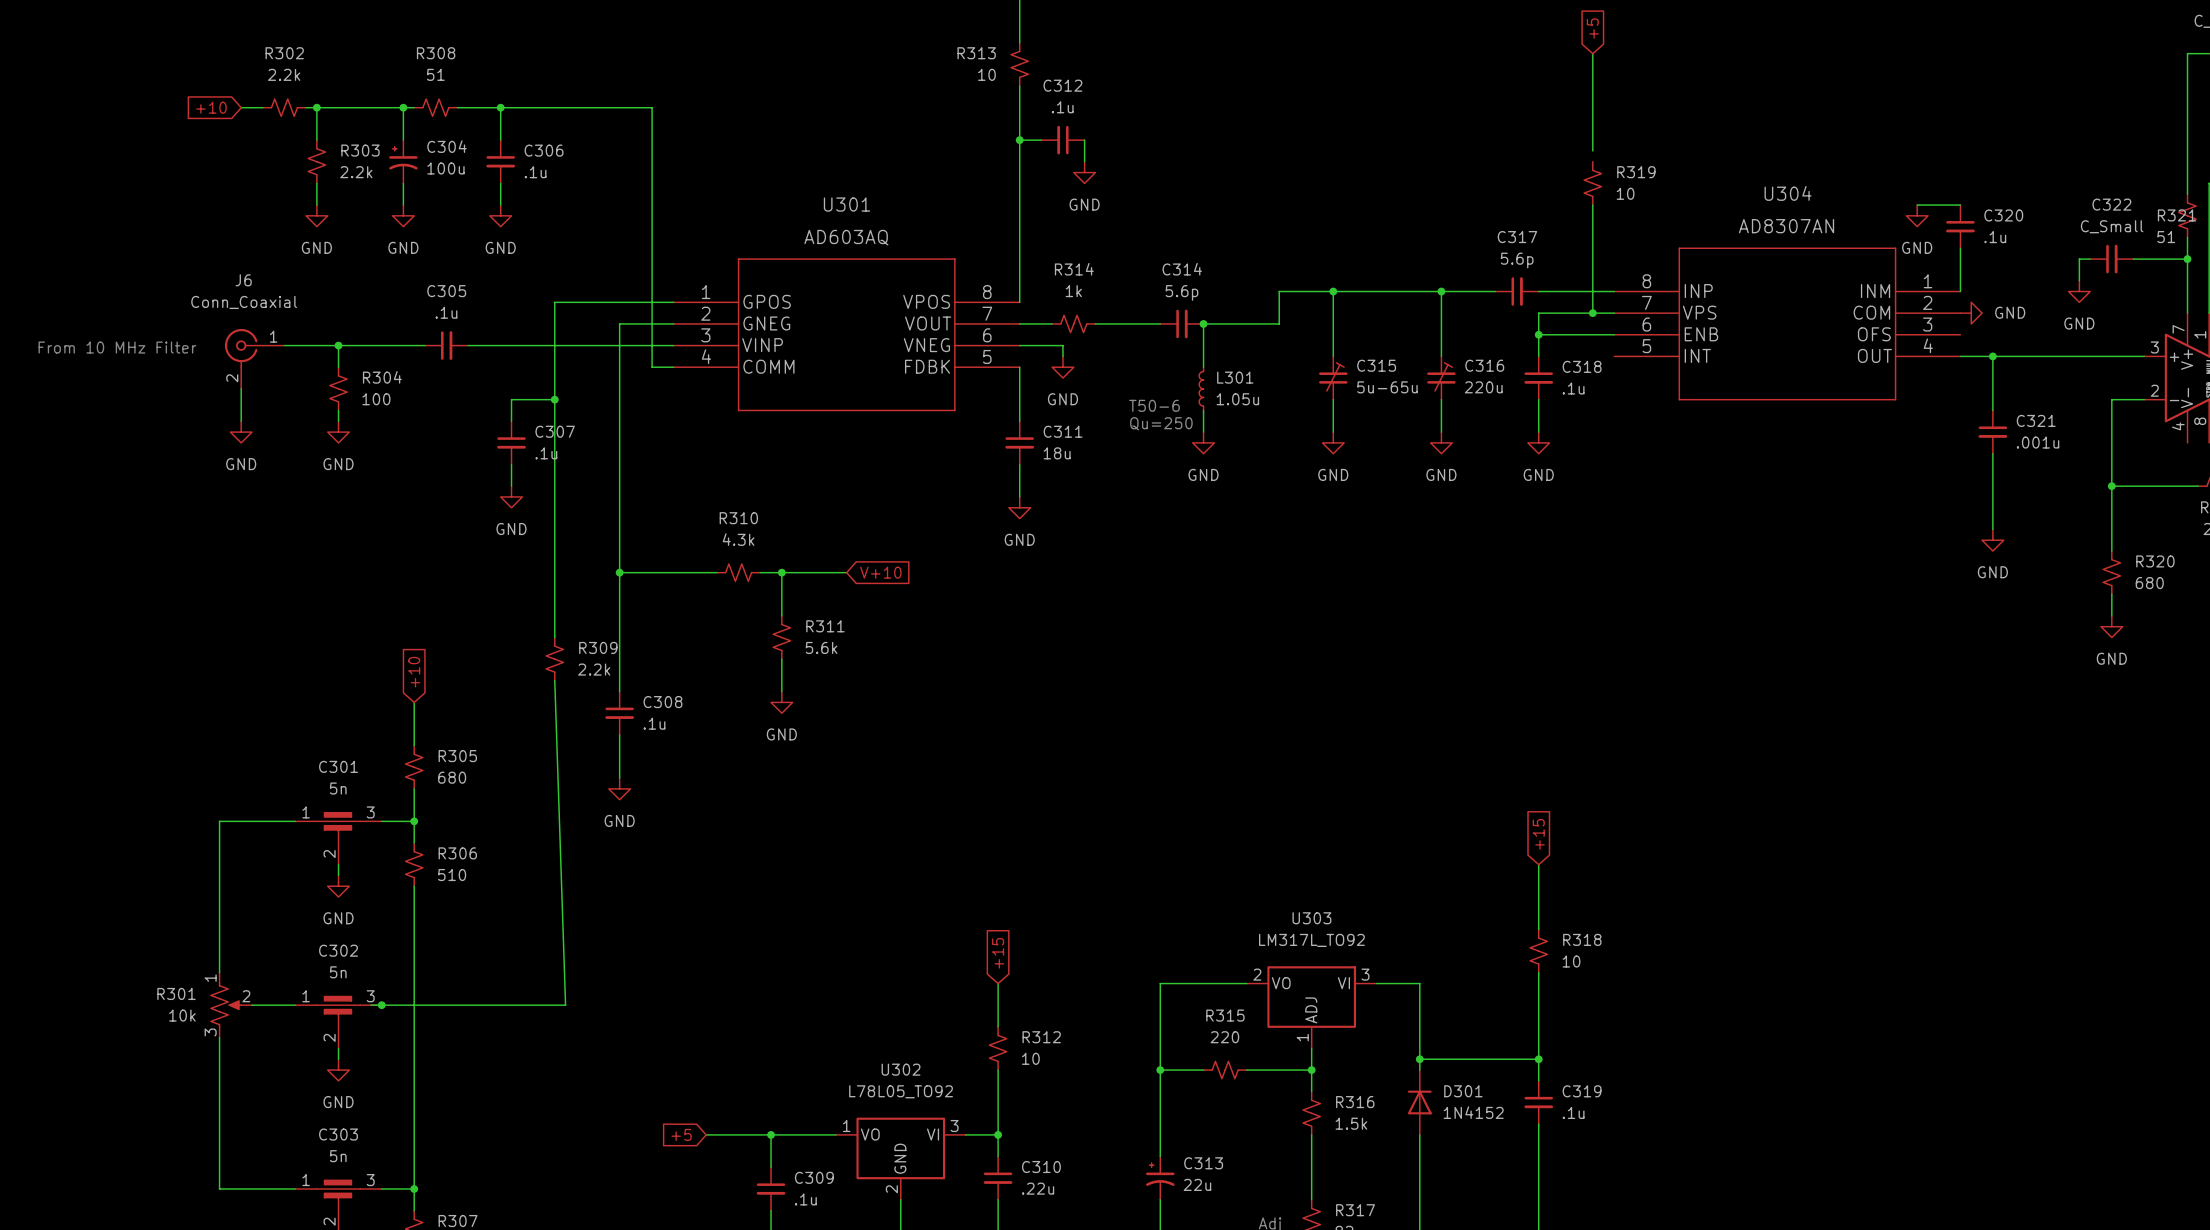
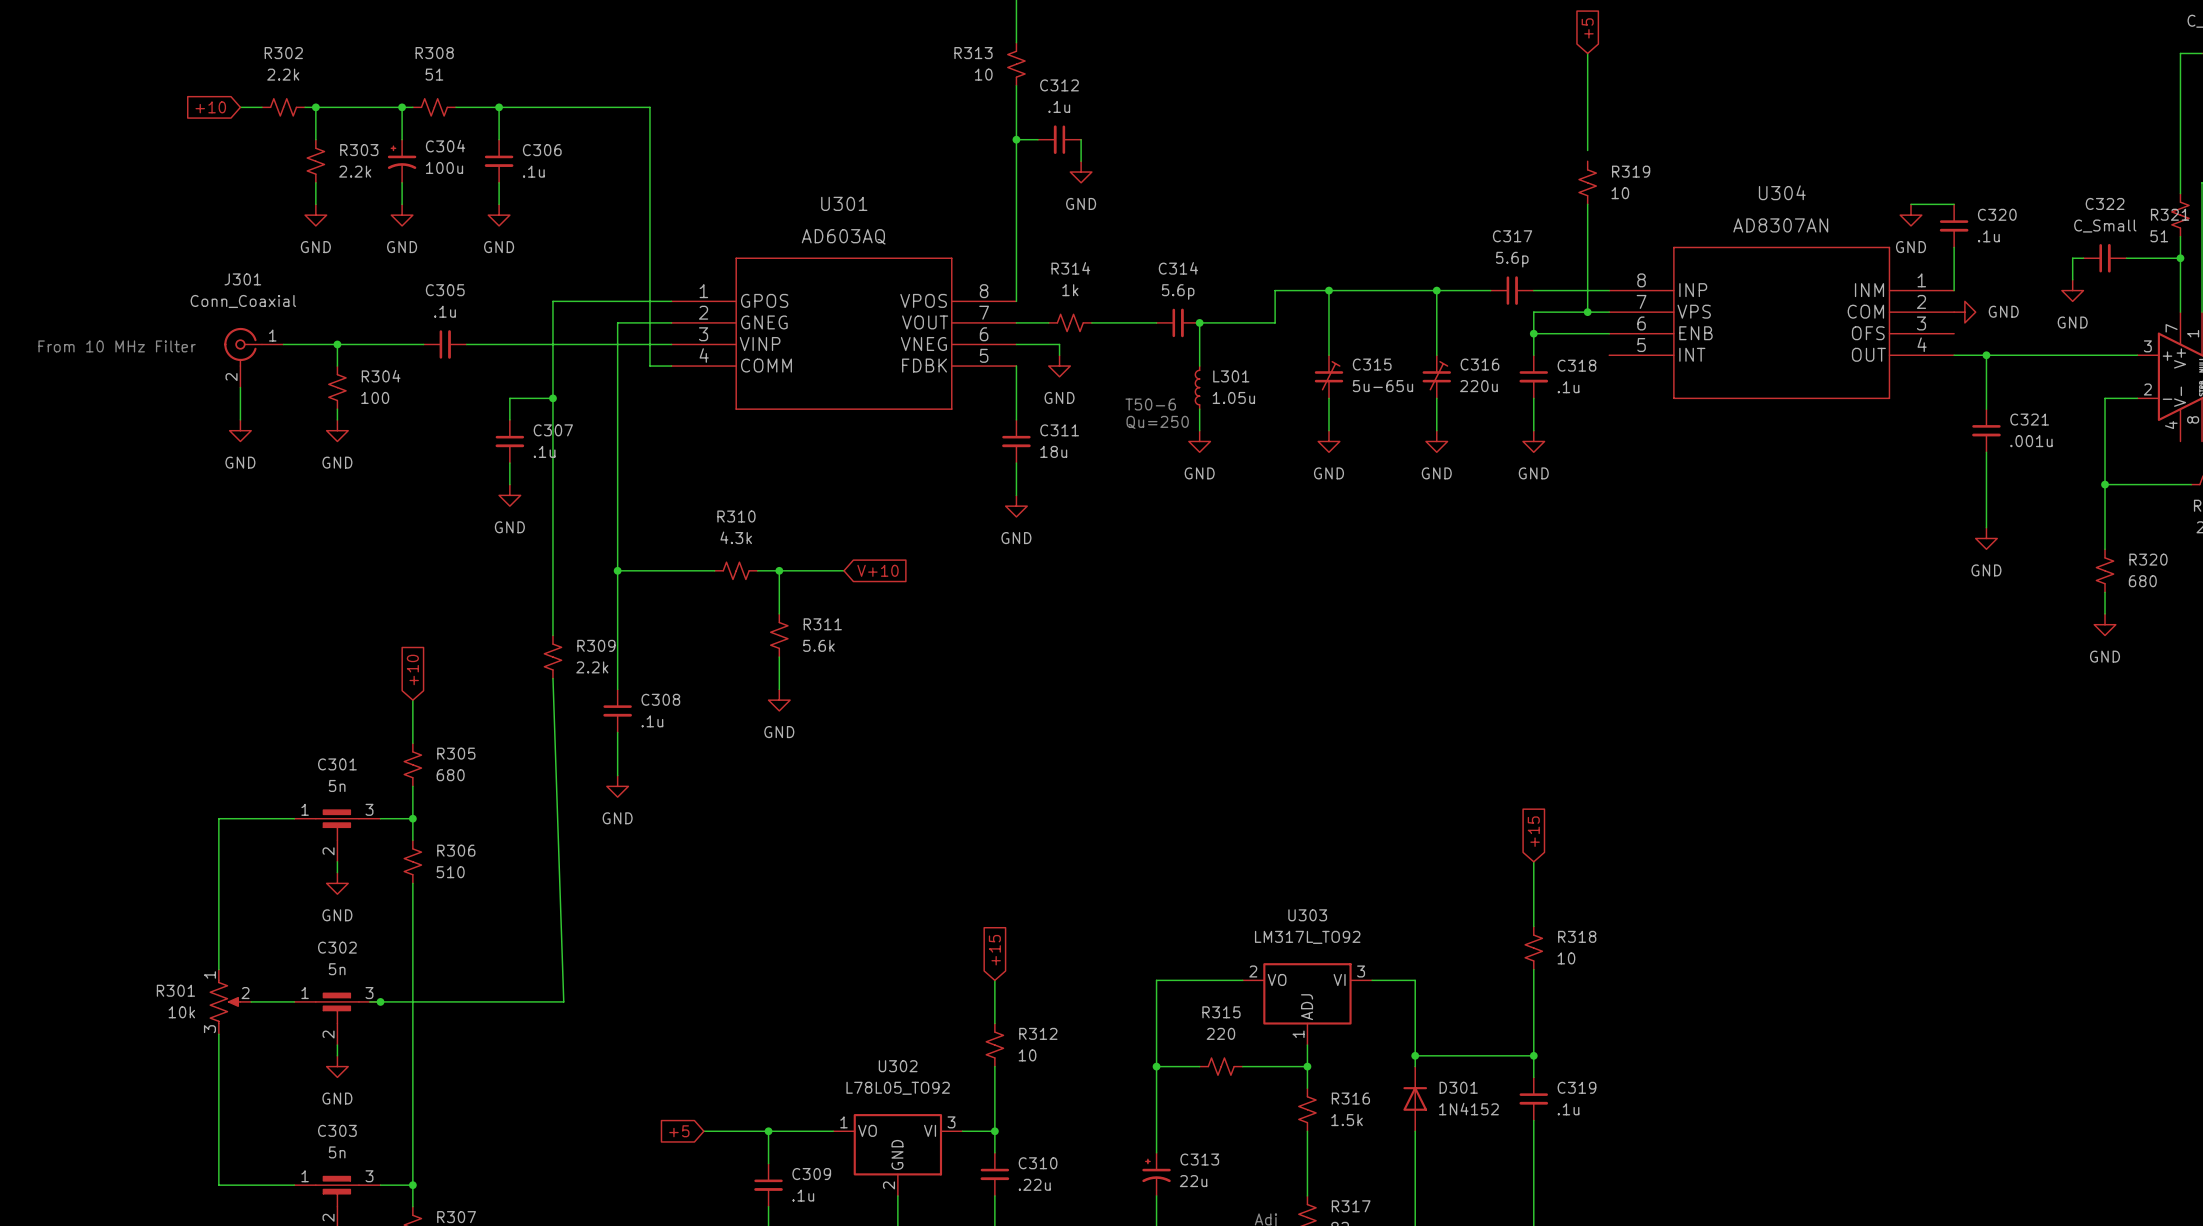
J6 name: J6 (243, 280) -> J301 (242, 279)

